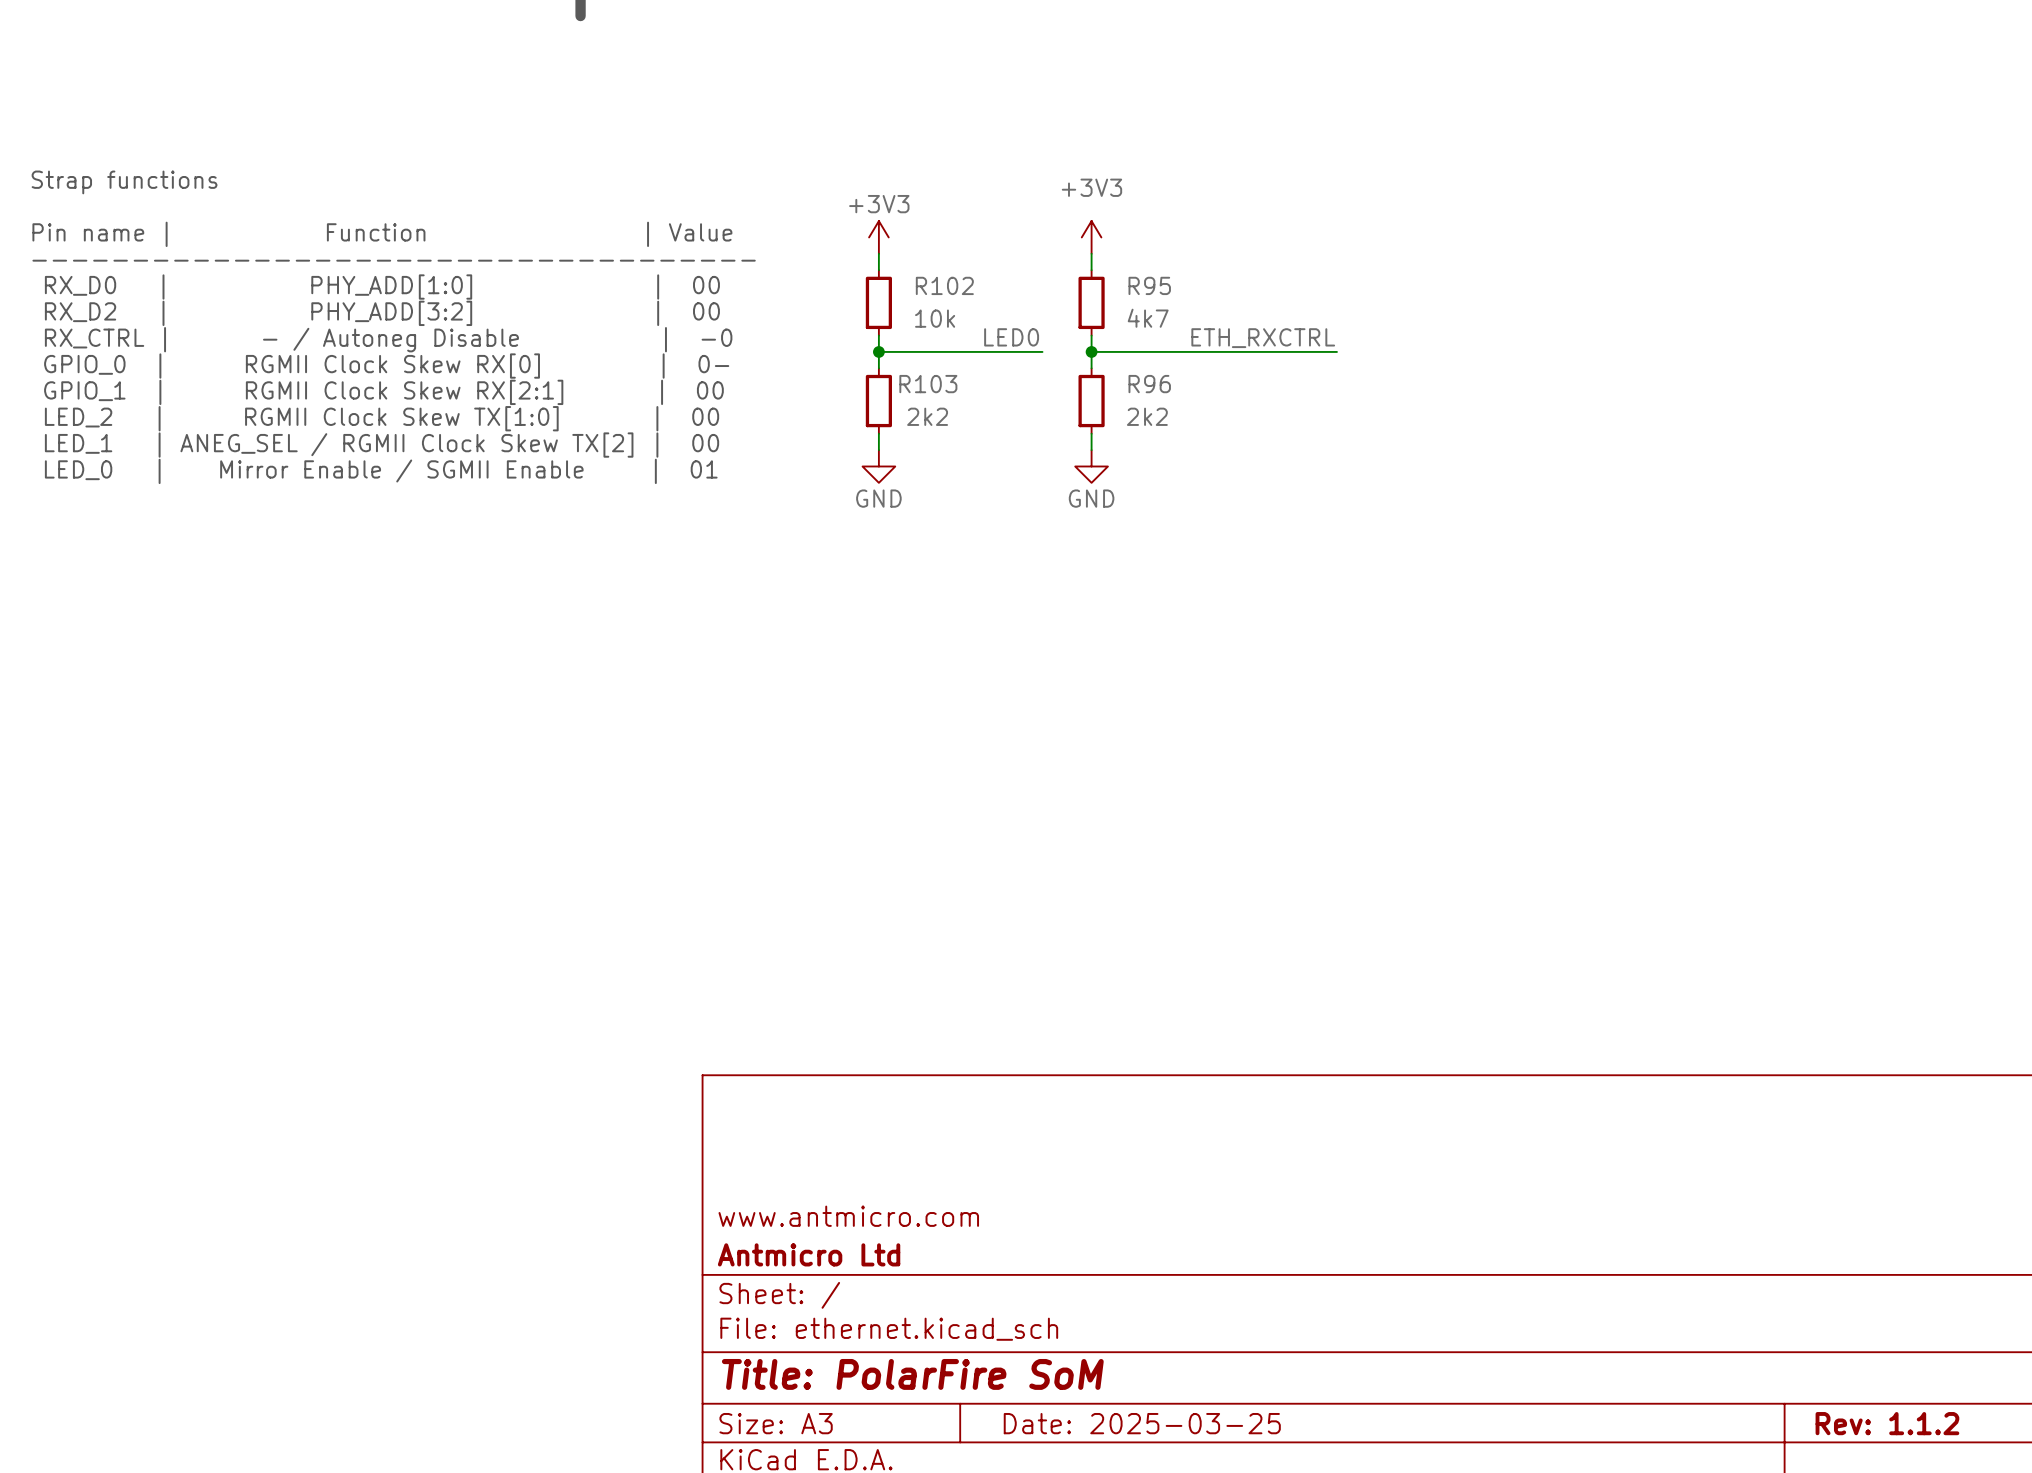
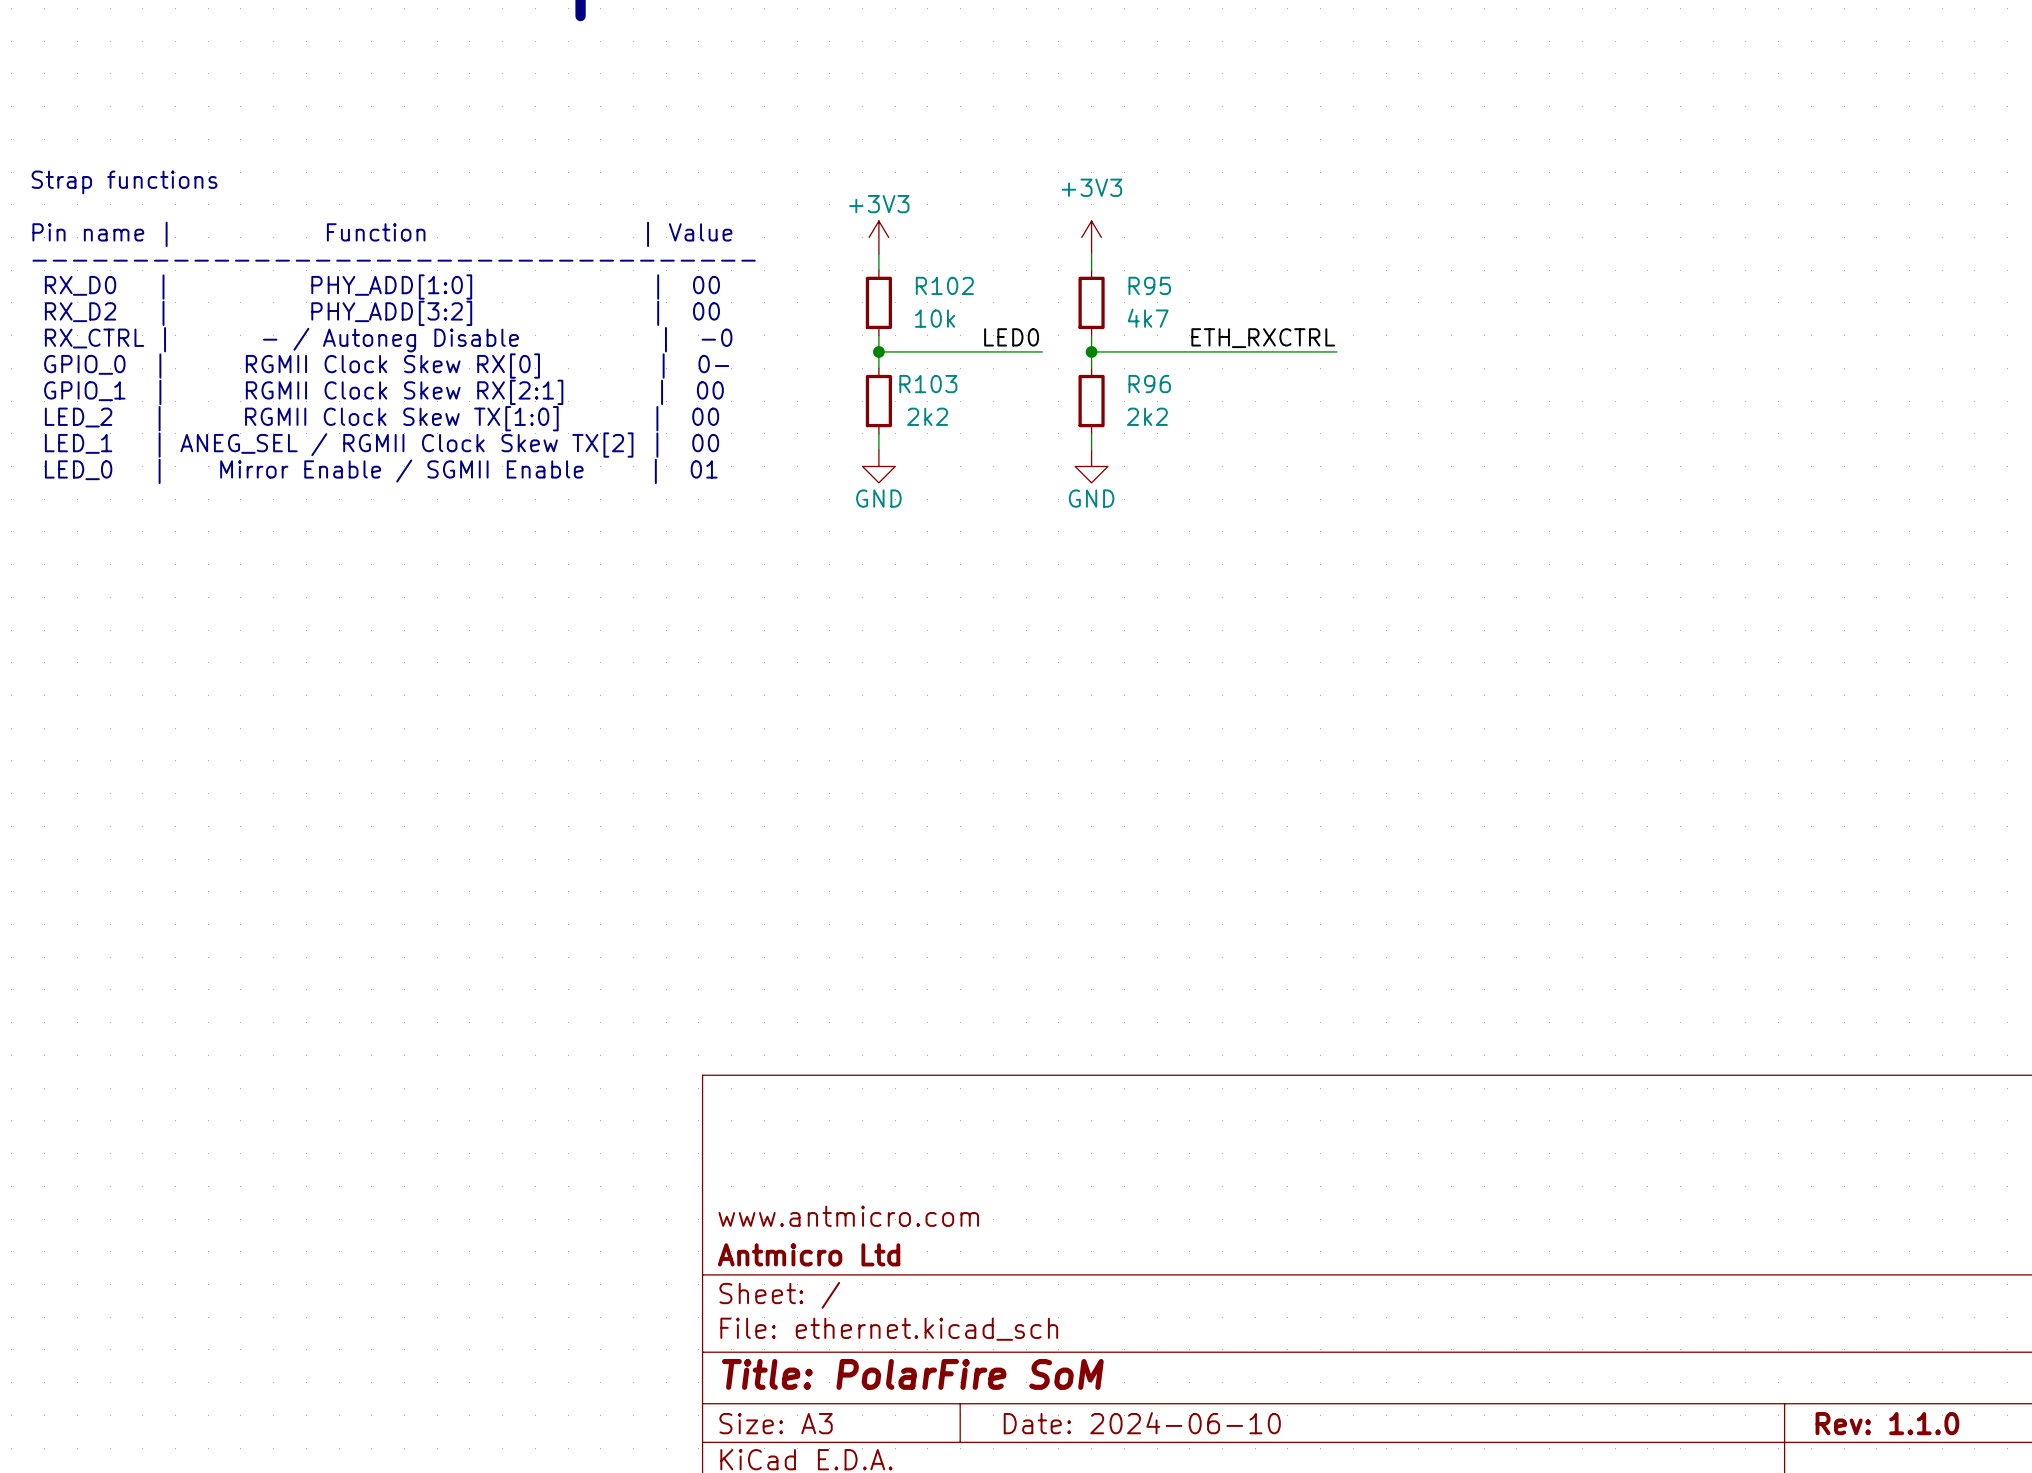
title block: Date: 2025-03-25 (1142, 1423) -> Date: 2024-06-10 (1142, 1423)
title block: Rev: 1.1.2 (1887, 1423) -> Rev: 1.1.0 (1887, 1423)

